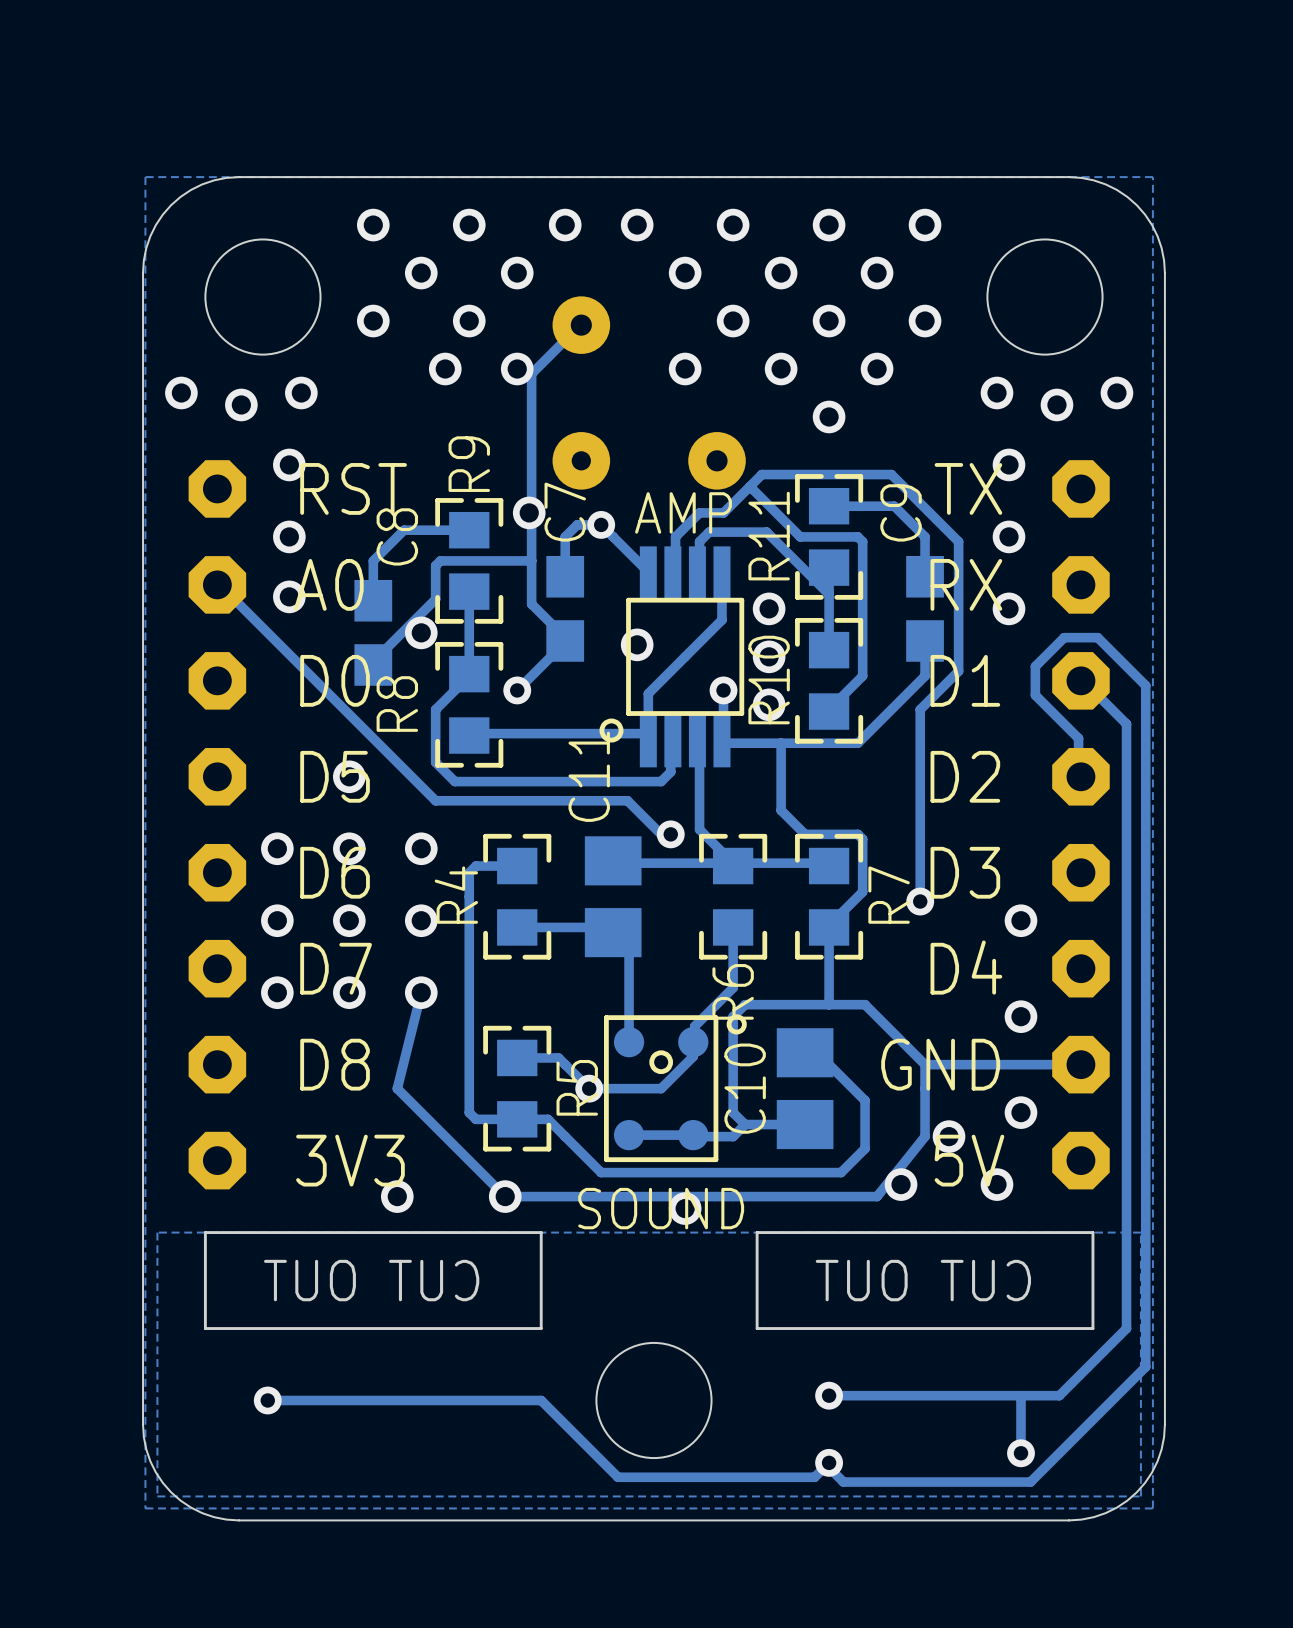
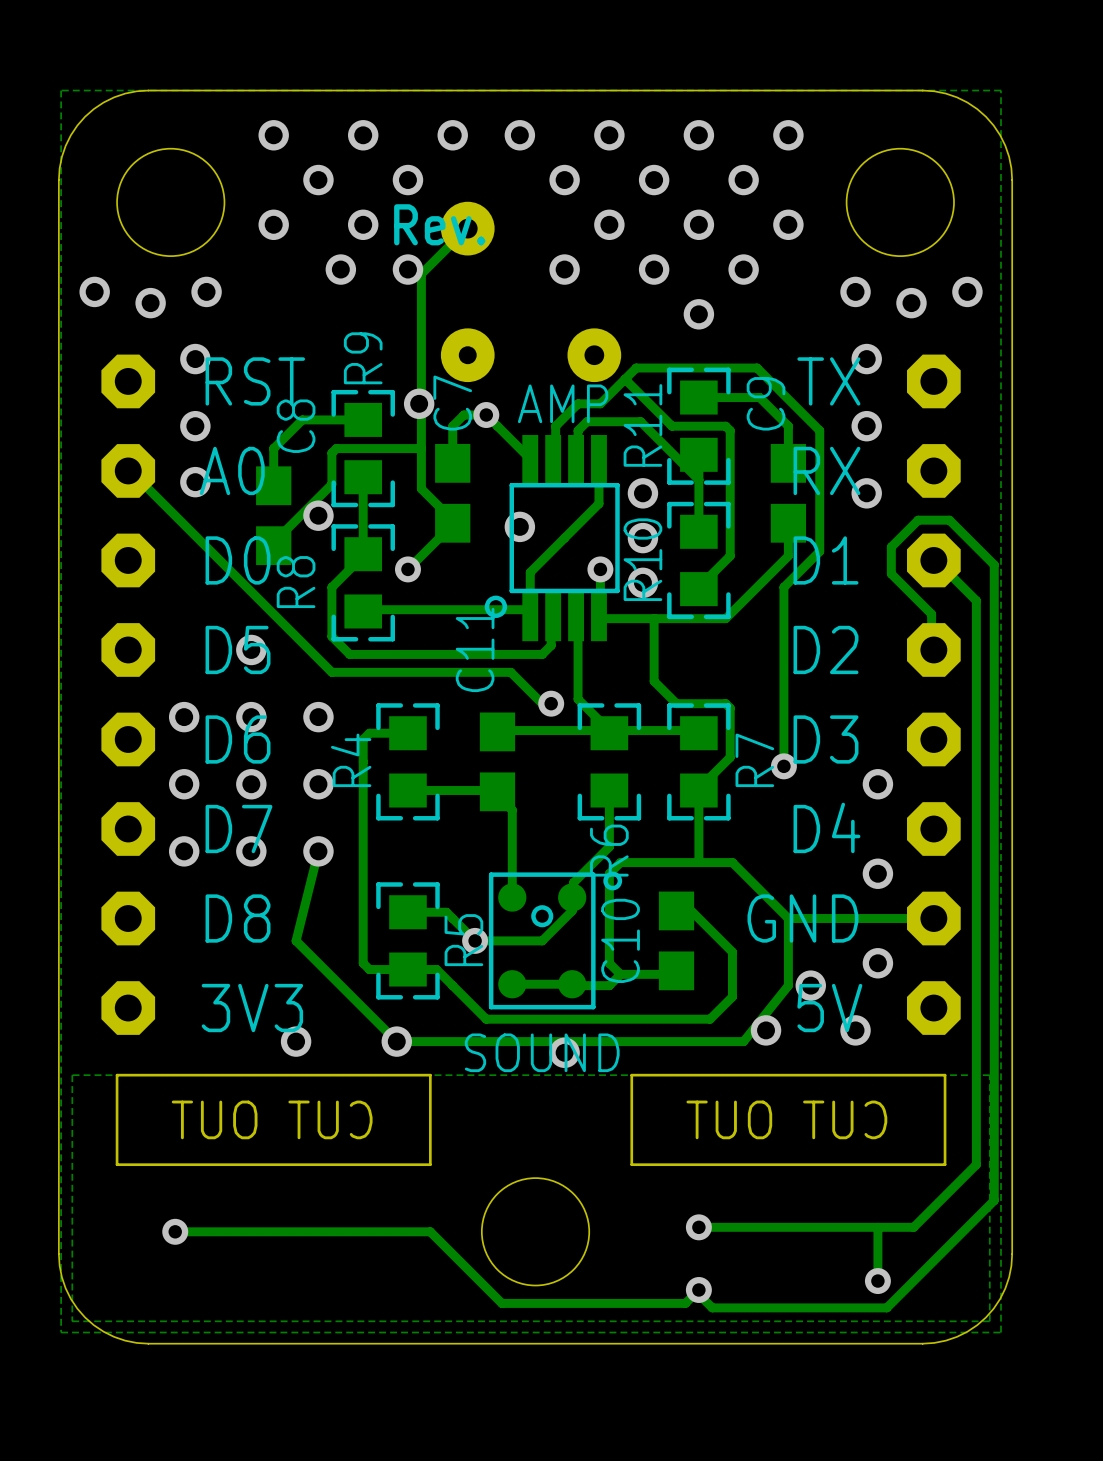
drawing: none -> [394, 204, 486, 246]
C11 footprint: [584, 836, 642, 958] -> [479, 712, 516, 812]
C10 footprint: [776, 1028, 834, 1150] -> [658, 891, 695, 991]

